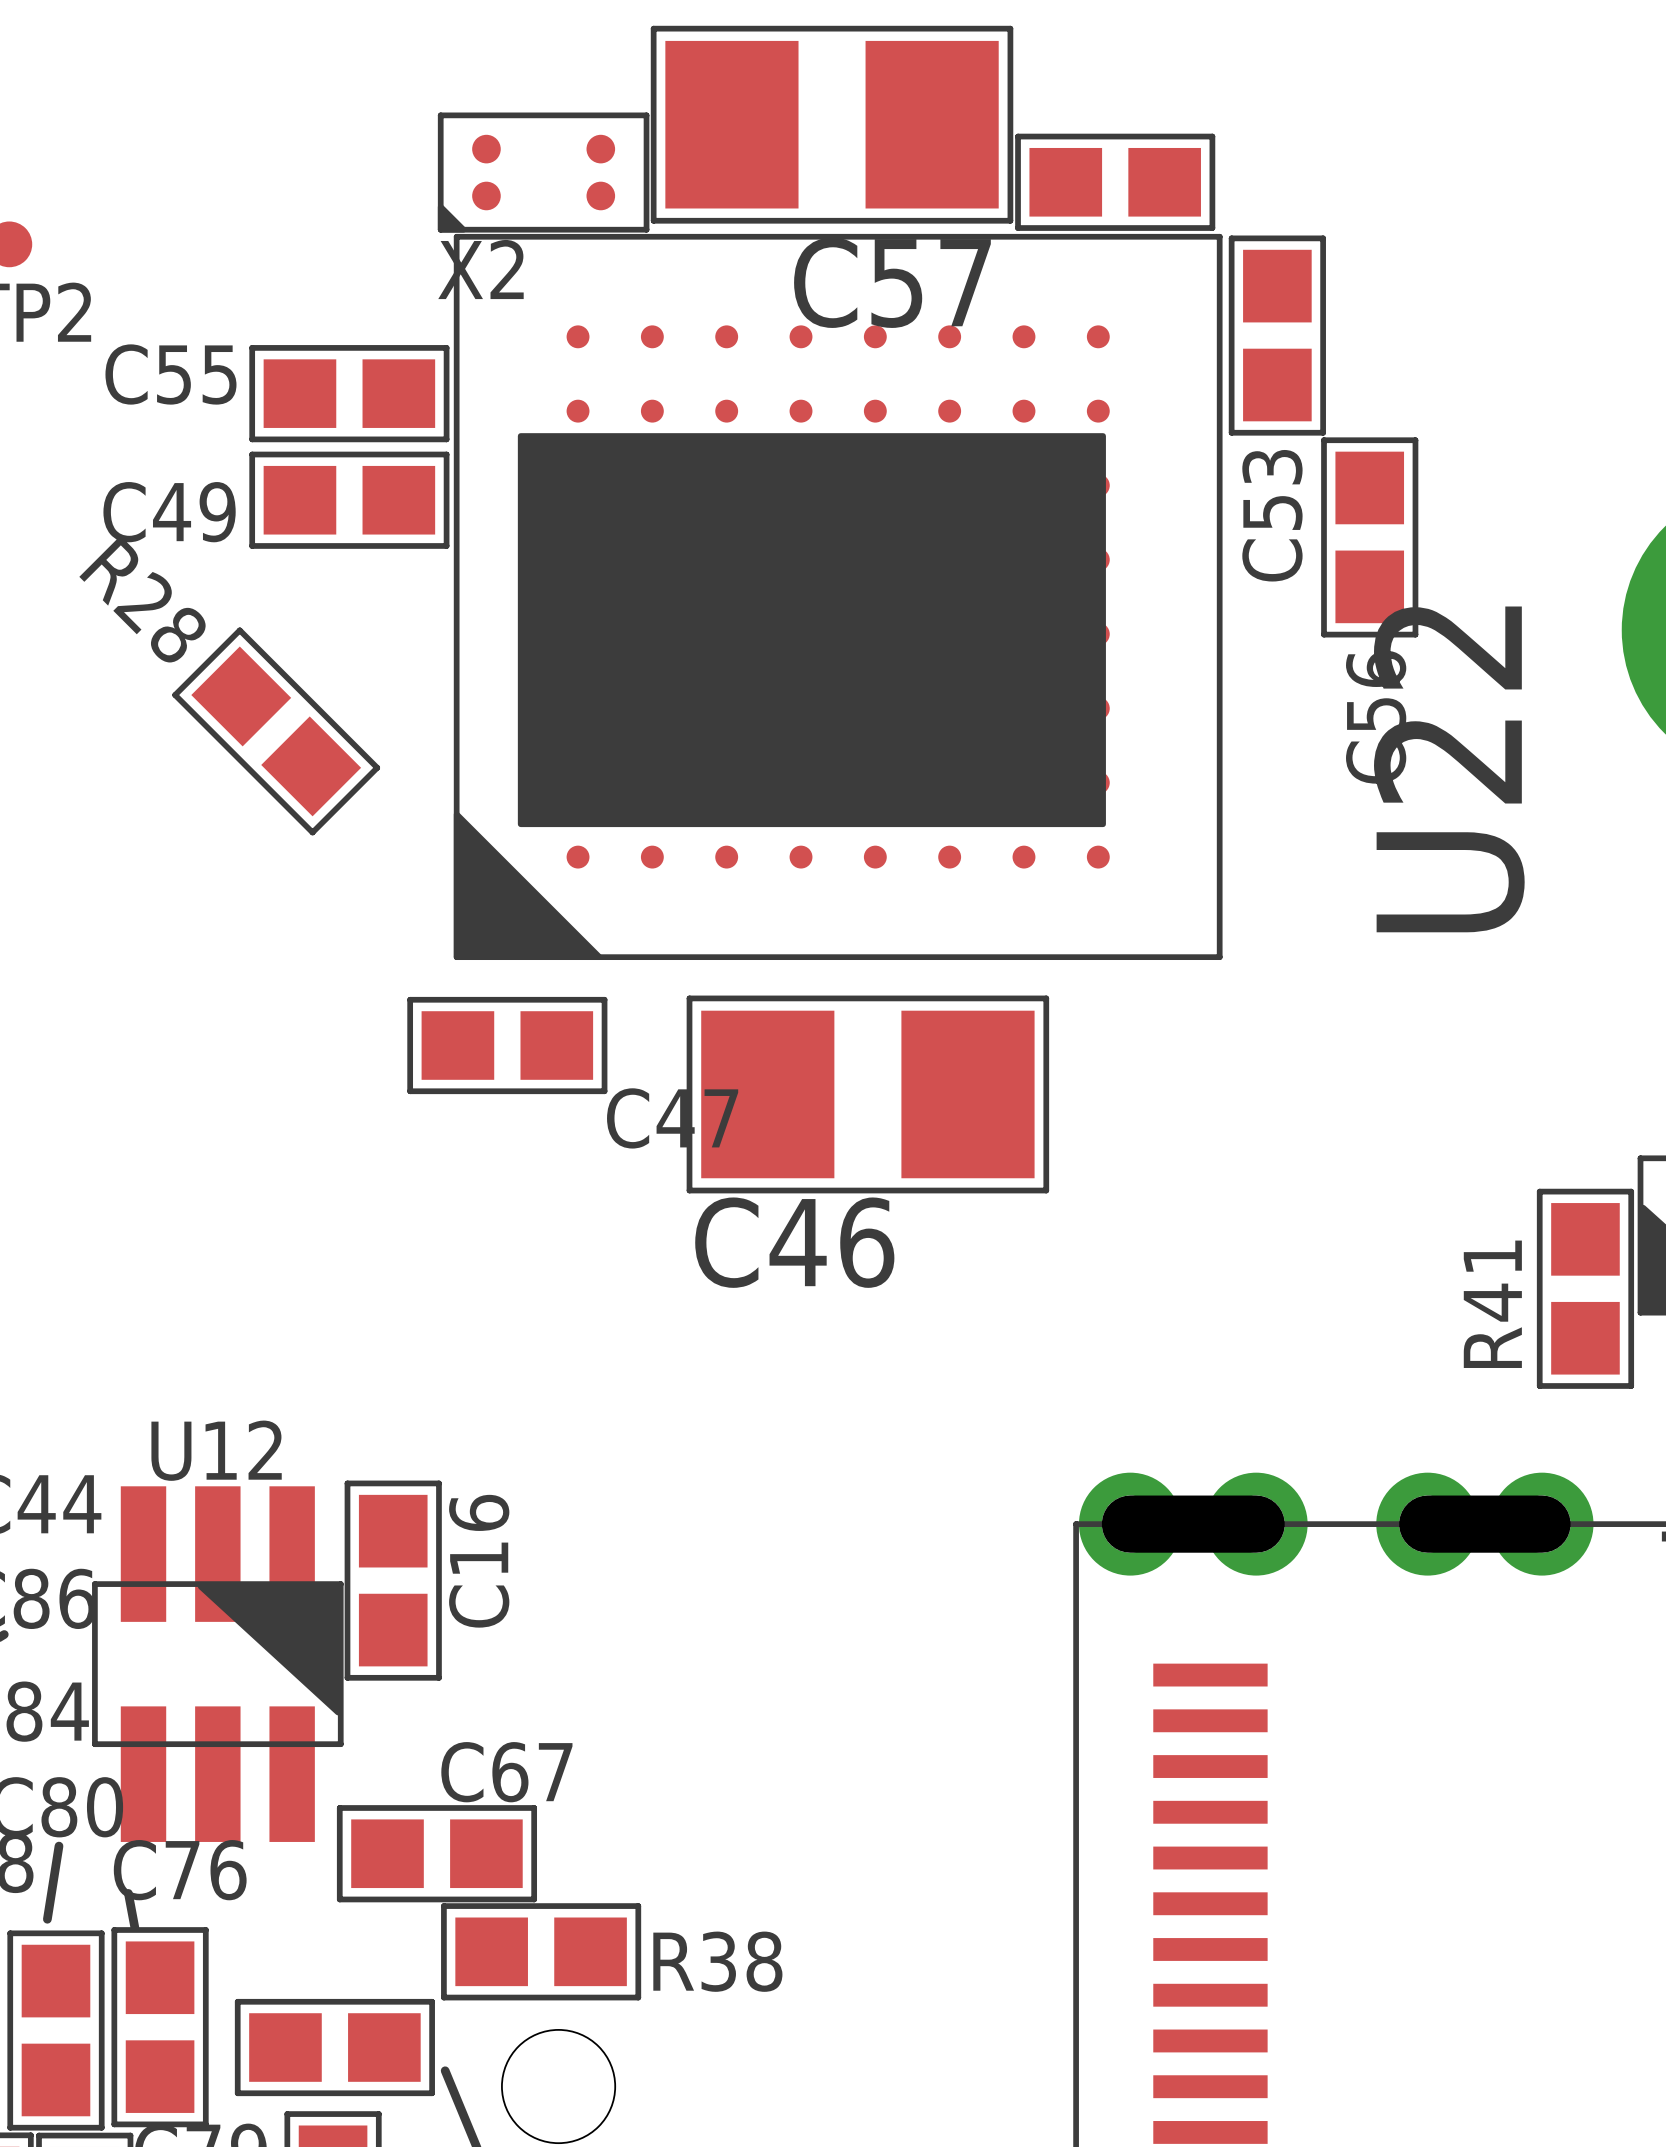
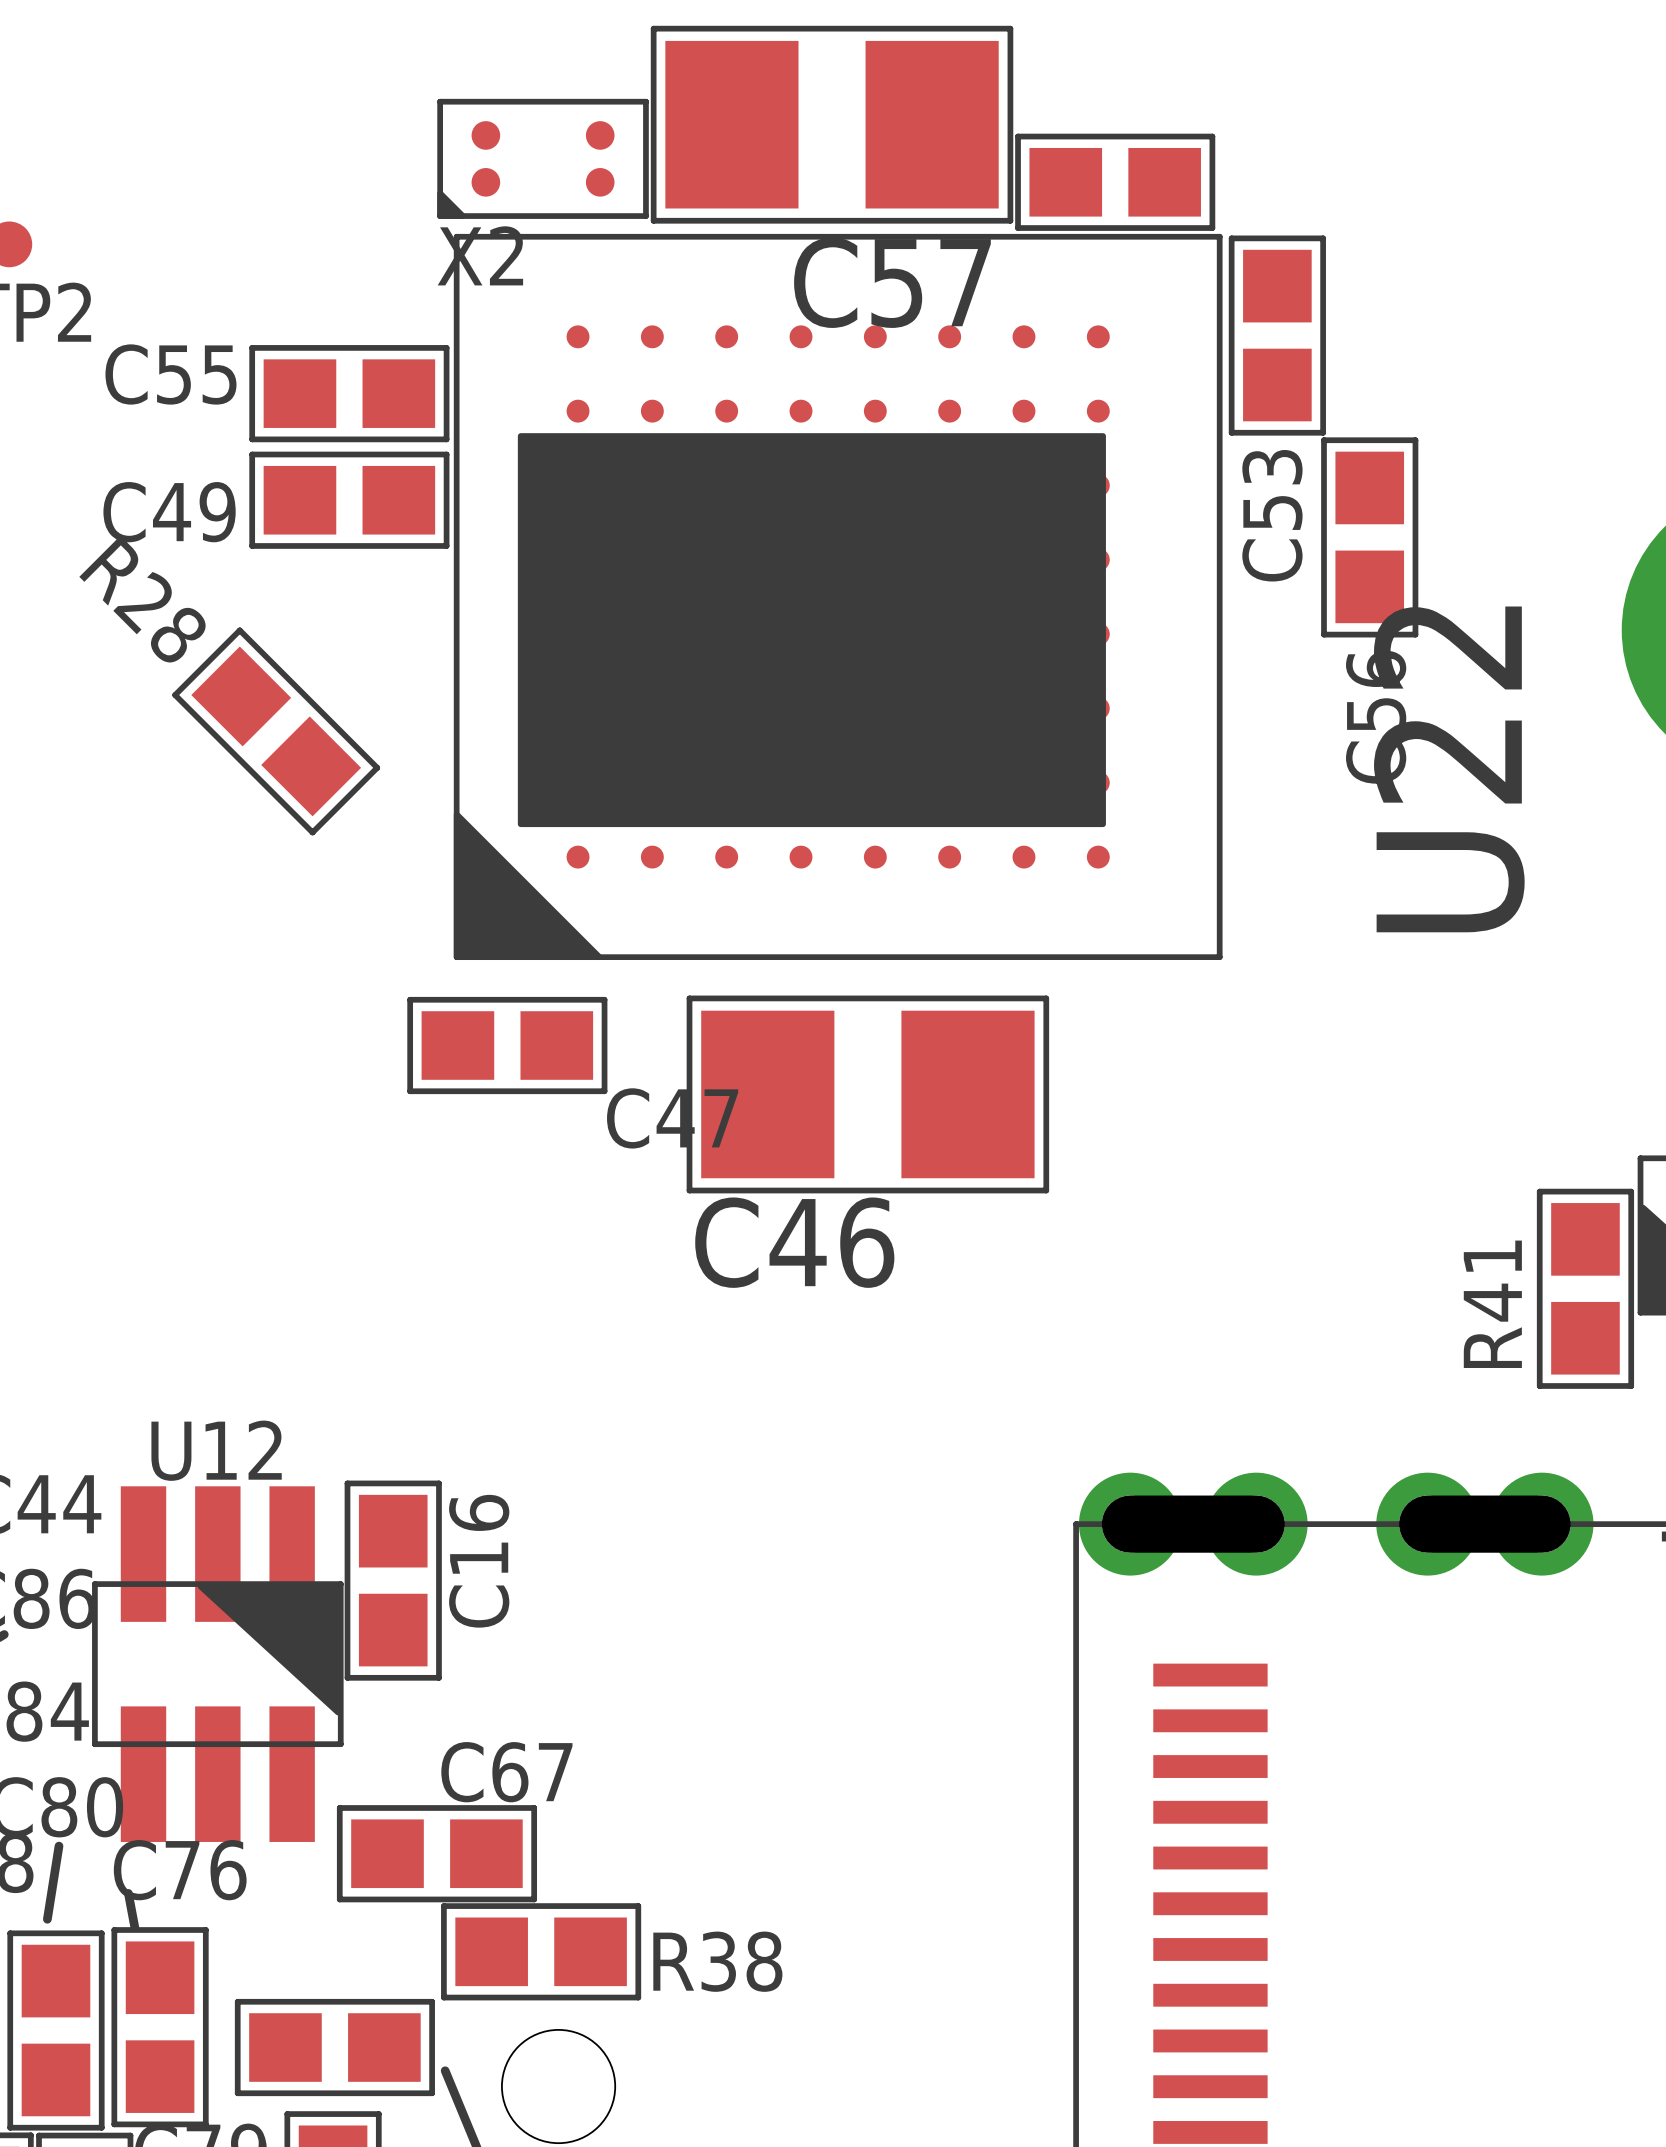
X2 position: (543, 172) -> (543, 158)

